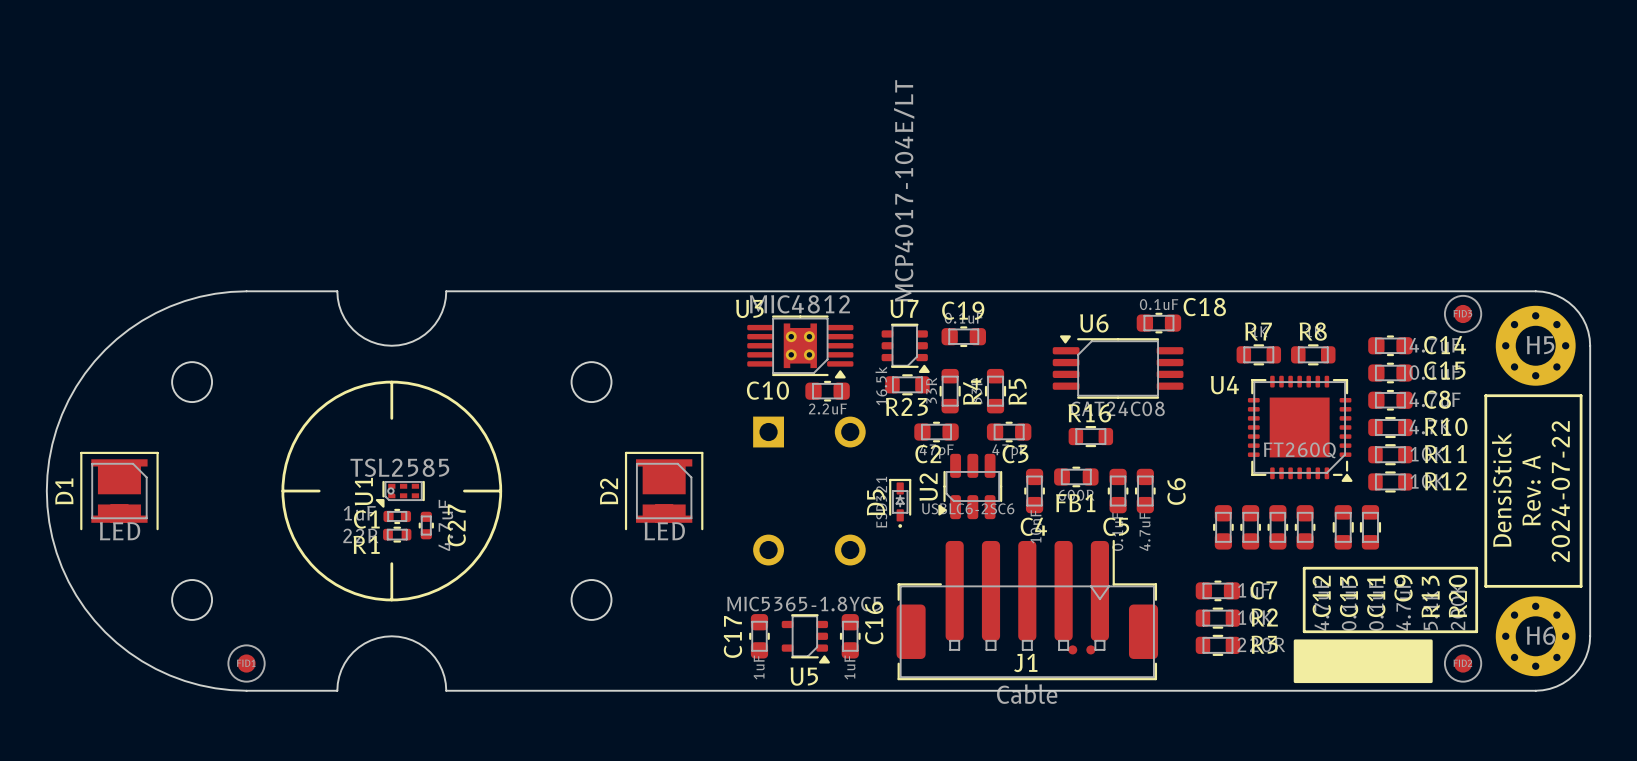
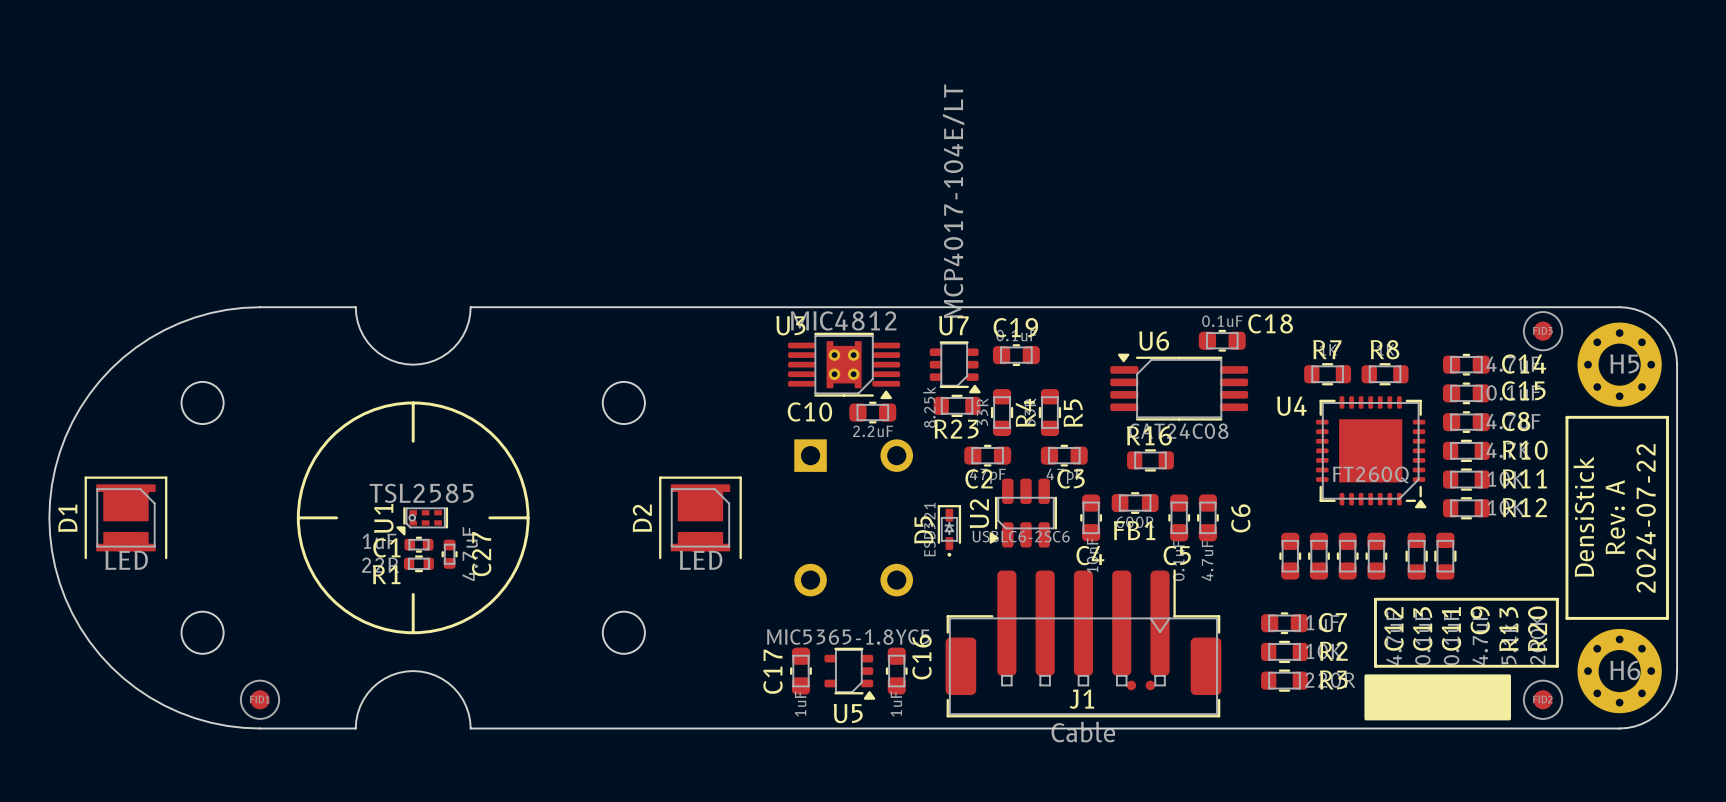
R23 value: 16.5k (881, 385) -> 8.25k (929, 407)

